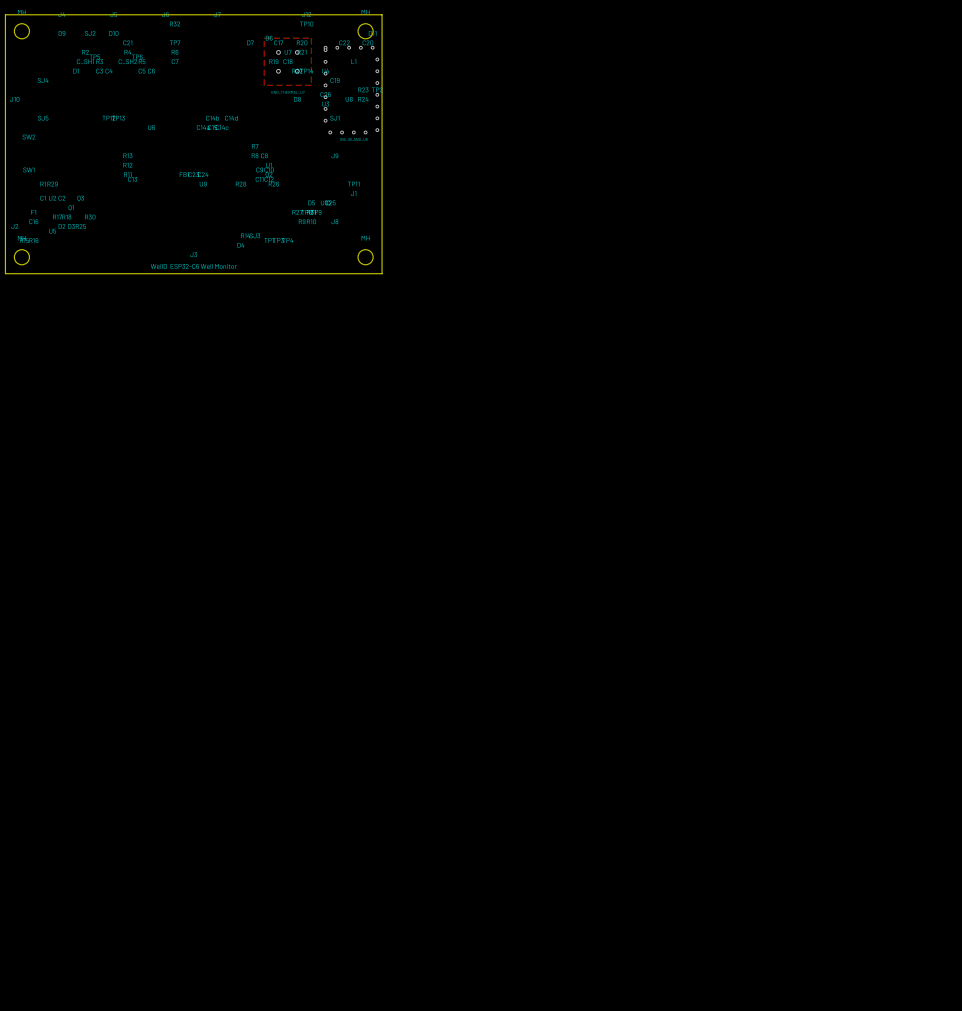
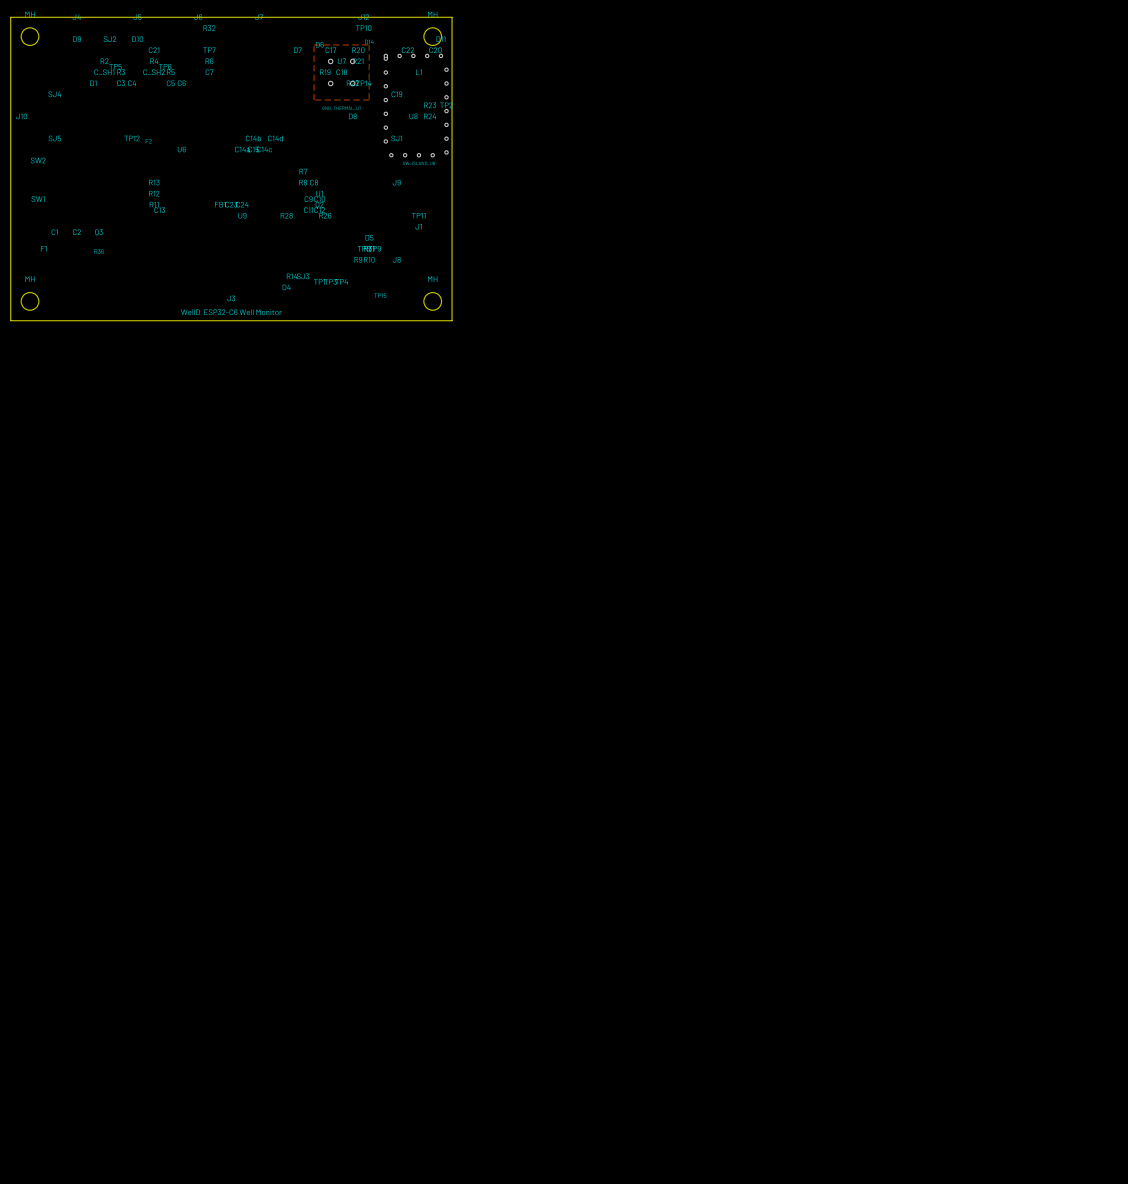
part: none -> (369, 41)
part: (325, 71) -> none
part: (325, 94) -> none
part: (325, 104) -> none
part: (118, 118) -> none
part: (43, 184) -> none
part: (52, 184) -> none
part: (52, 198) -> none
part: (325, 202) -> none
part: (330, 202) -> none
part: (71, 207) -> none
part: (297, 212) -> none
part: none -> (99, 251)
part: (57, 217) -> none
part: (66, 217) -> none
part: (90, 217) -> none
part: (33, 221) -> none
part: (14, 226) -> none
part: (62, 226) -> none
part: (71, 226) -> none
part: (80, 226) -> none
part: (52, 231) -> none
part: (24, 240) -> none
part: (33, 240) -> none
part: none -> (380, 295)

